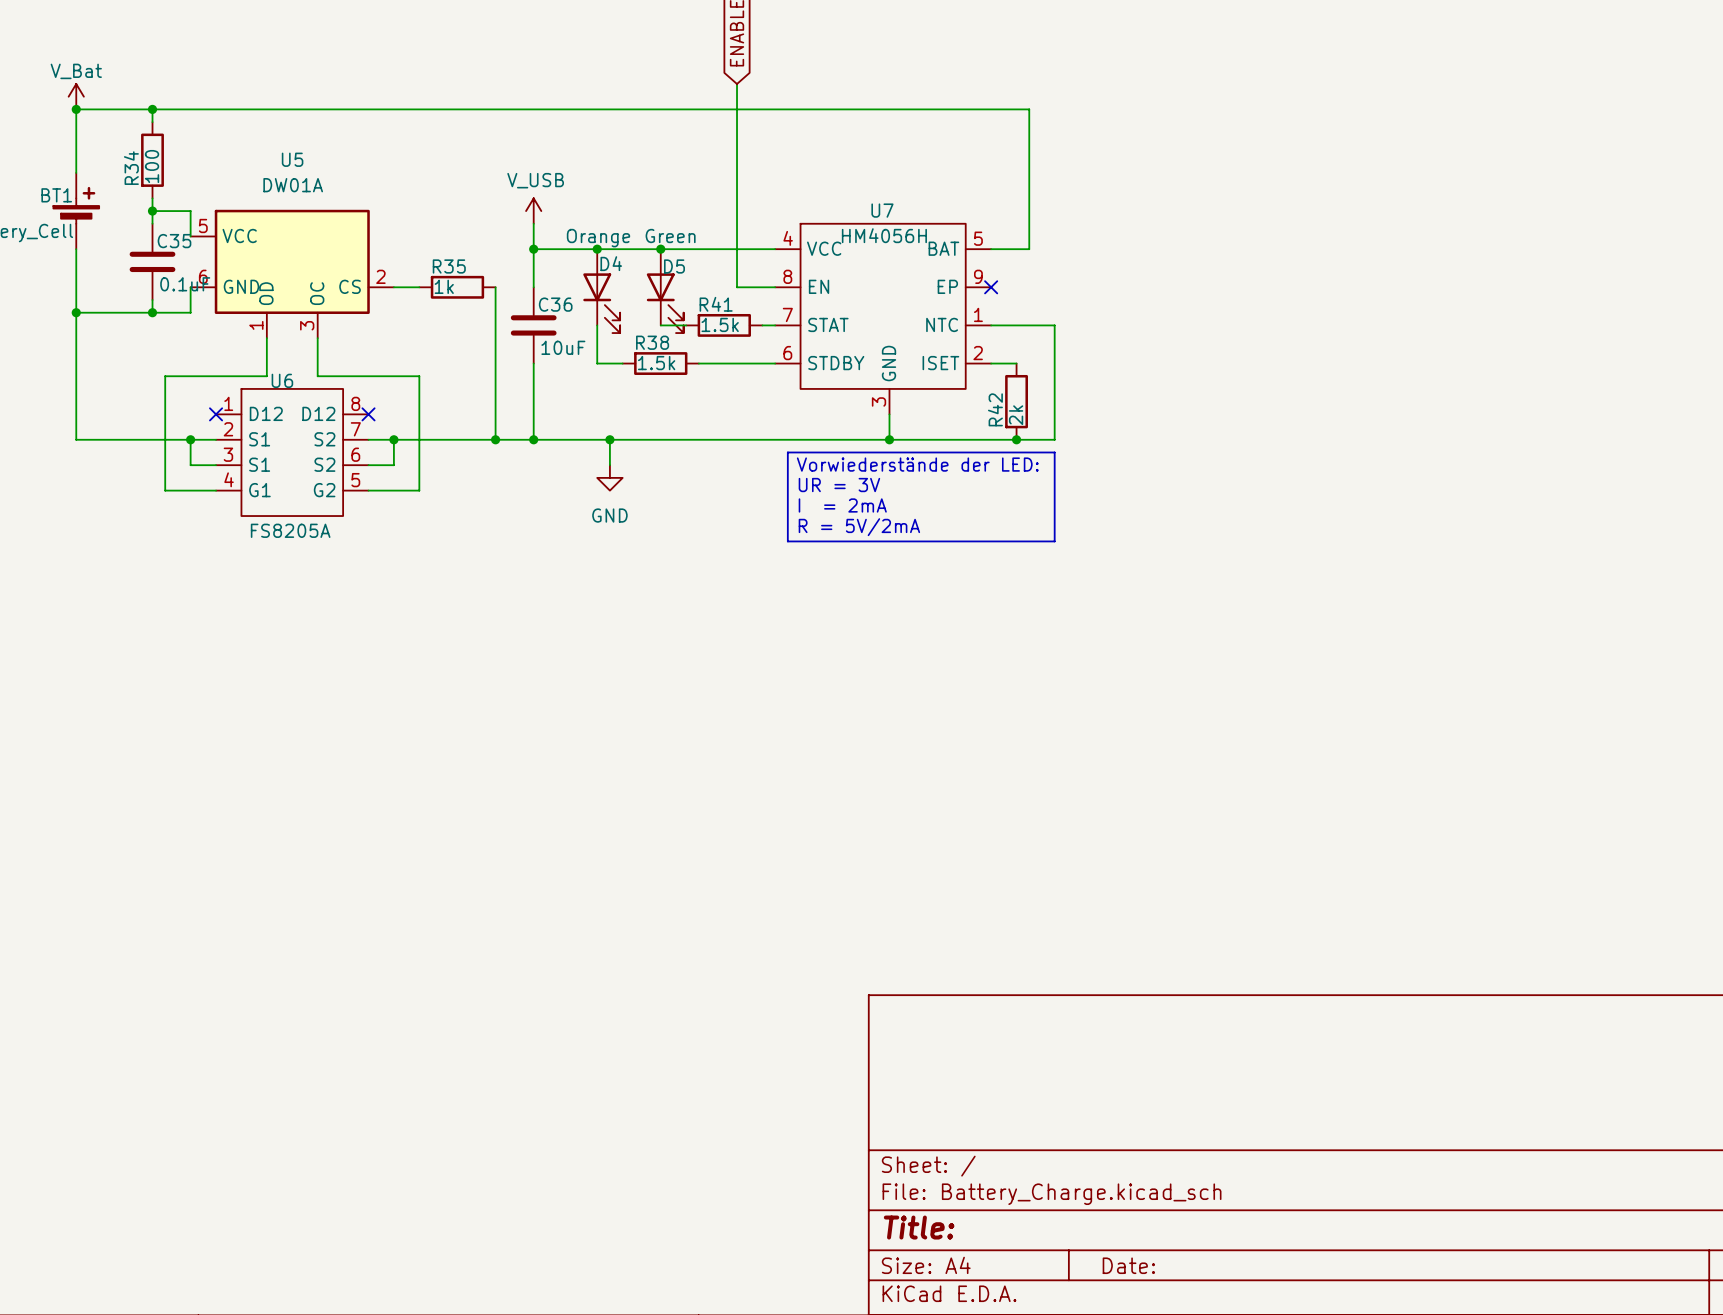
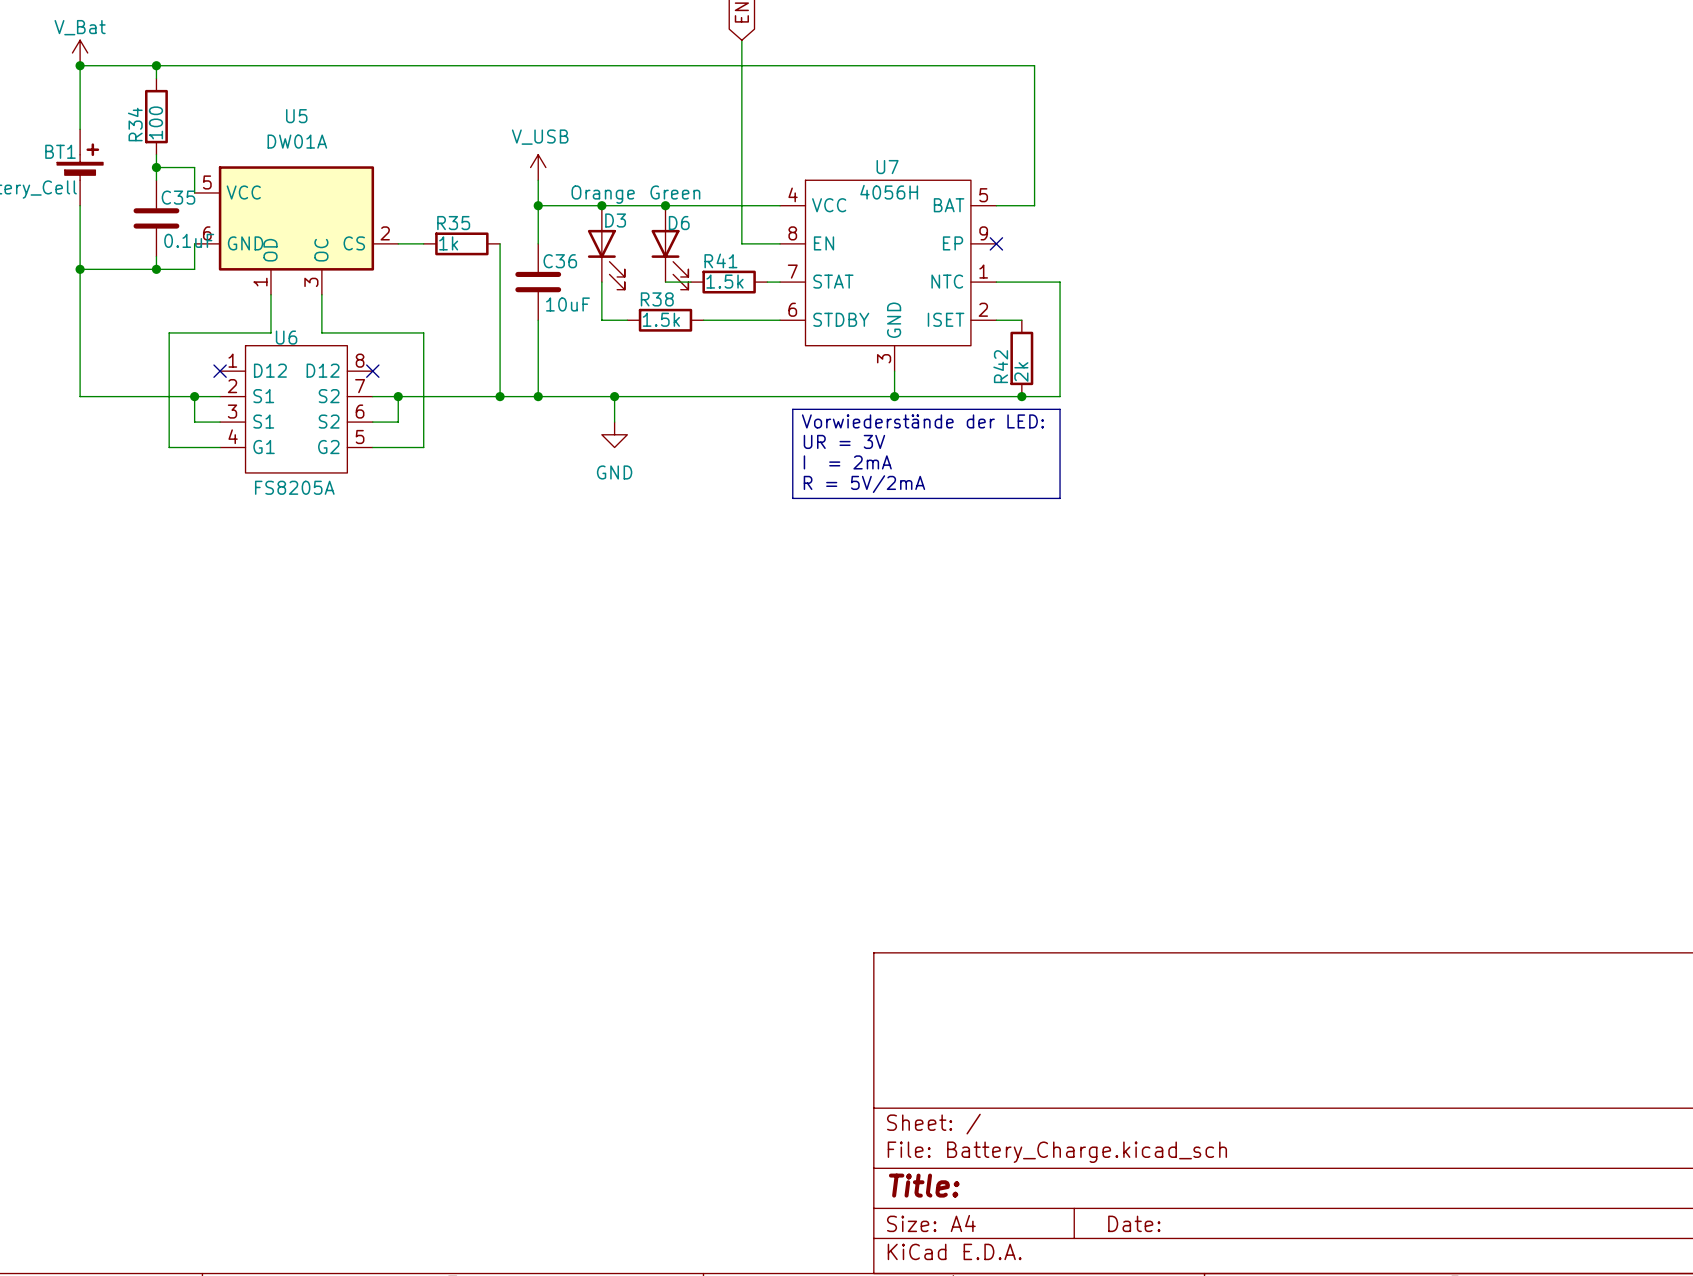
U7 value: HM4056H (884, 235) -> 4056H (889, 192)
D4 name: D4 (611, 263) -> D3 (615, 220)
D5 name: D5 (674, 266) -> D6 (679, 223)

